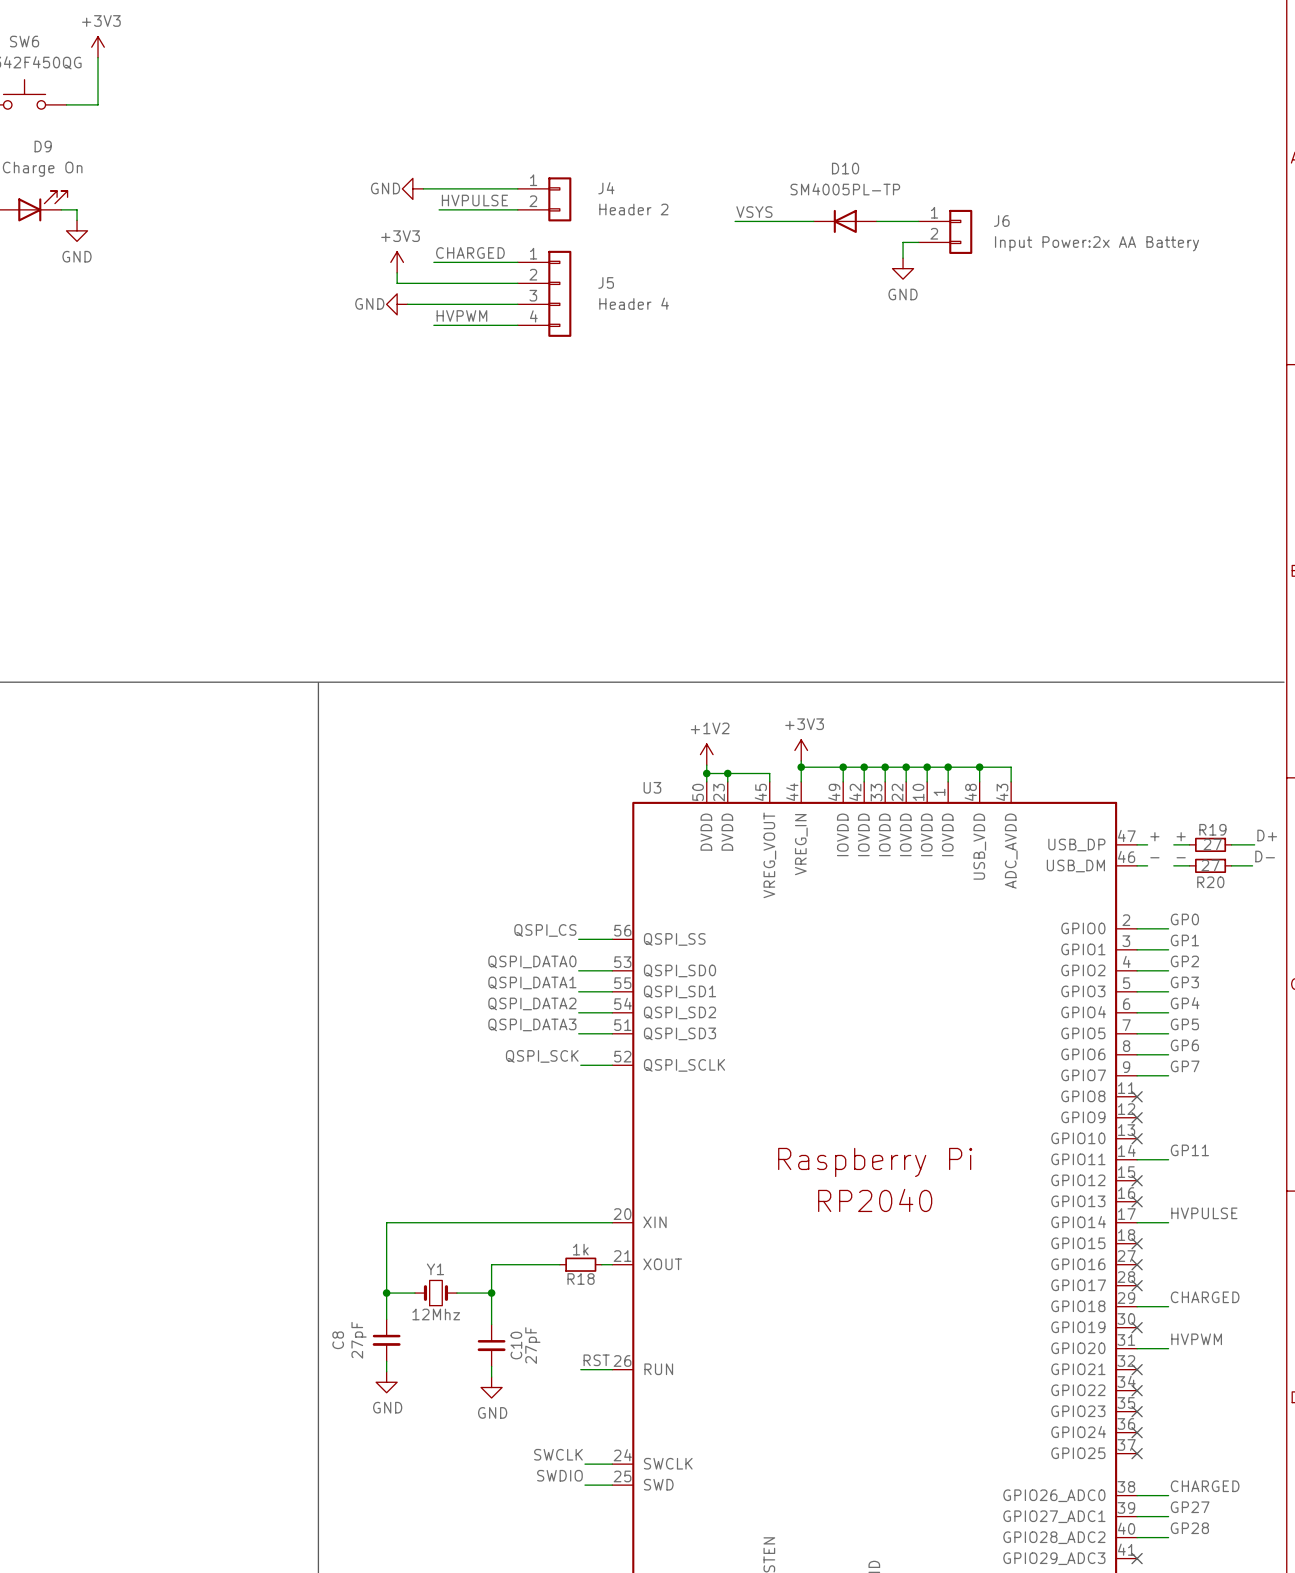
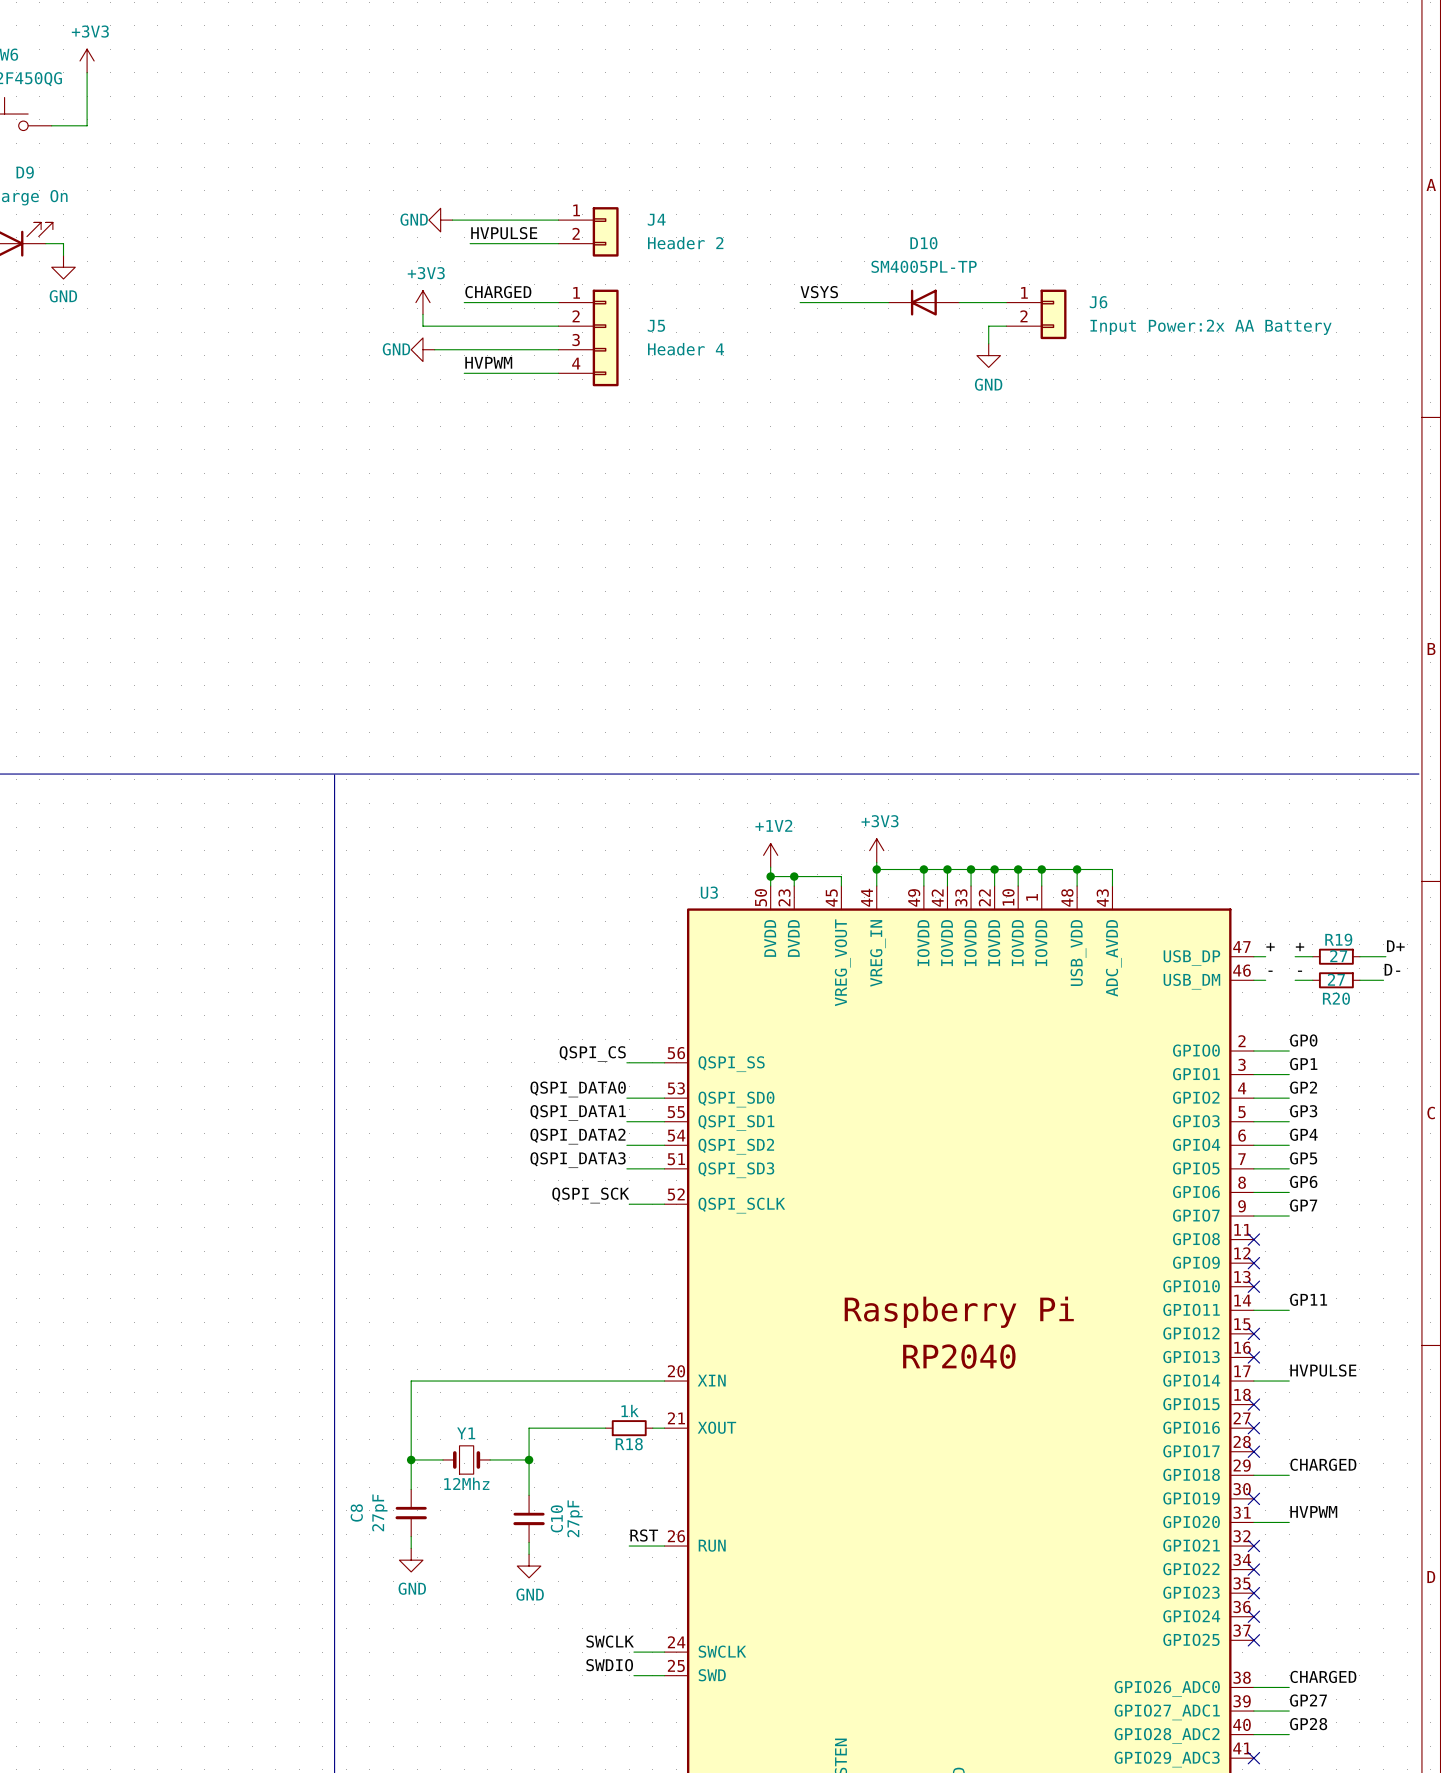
label position: VSYS (754, 212) -> VSYS (819, 292)
wire: (735, 221) (813, 221) -> (800, 302) (888, 302)
D10 position: (845, 221) -> (923, 302)
wire: (876, 221) (918, 221) -> (959, 302) (1006, 302)
J6 position: (945, 231) -> (1036, 314)
wire: (918, 242) (903, 242) (903, 258) -> (1006, 326) (988, 326) (988, 343)
power symbol position: GND (903, 268) -> GND (988, 355)

